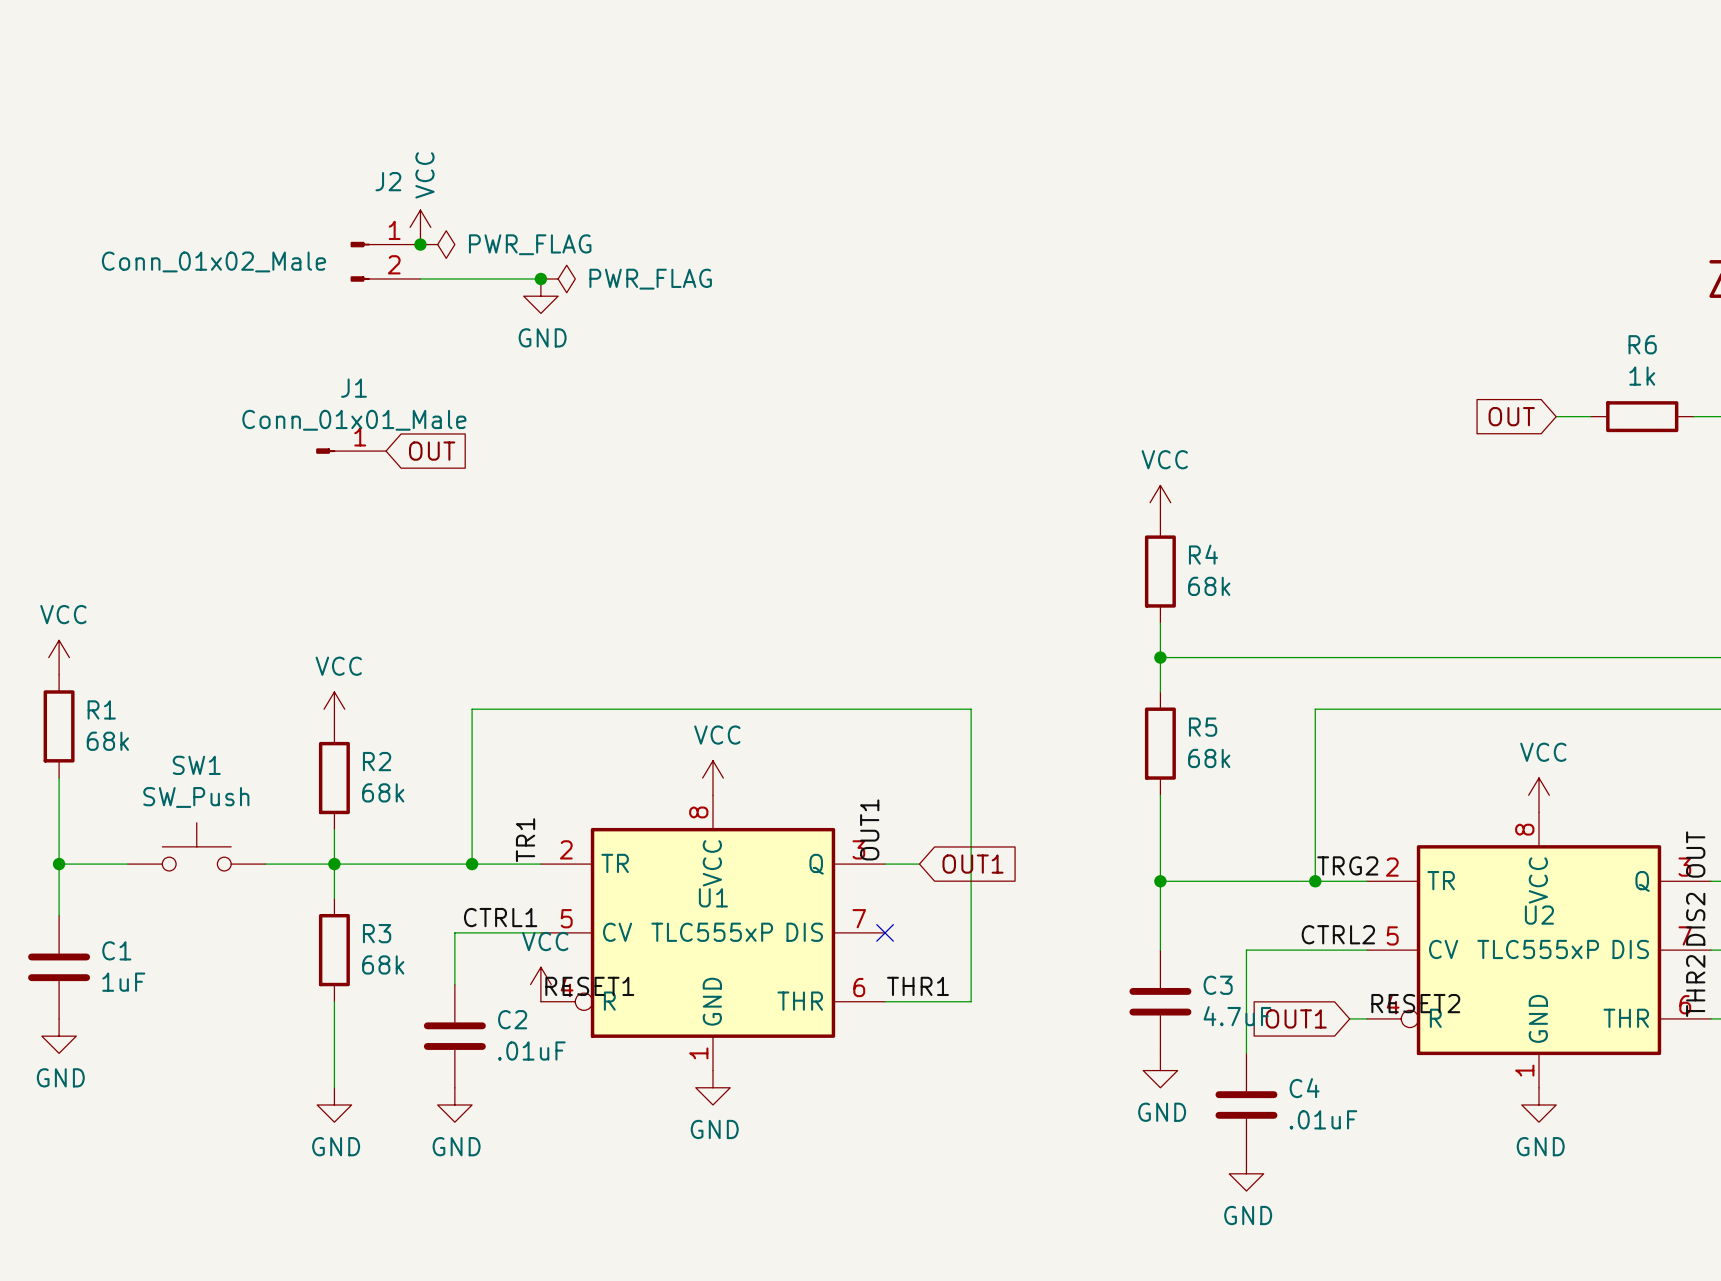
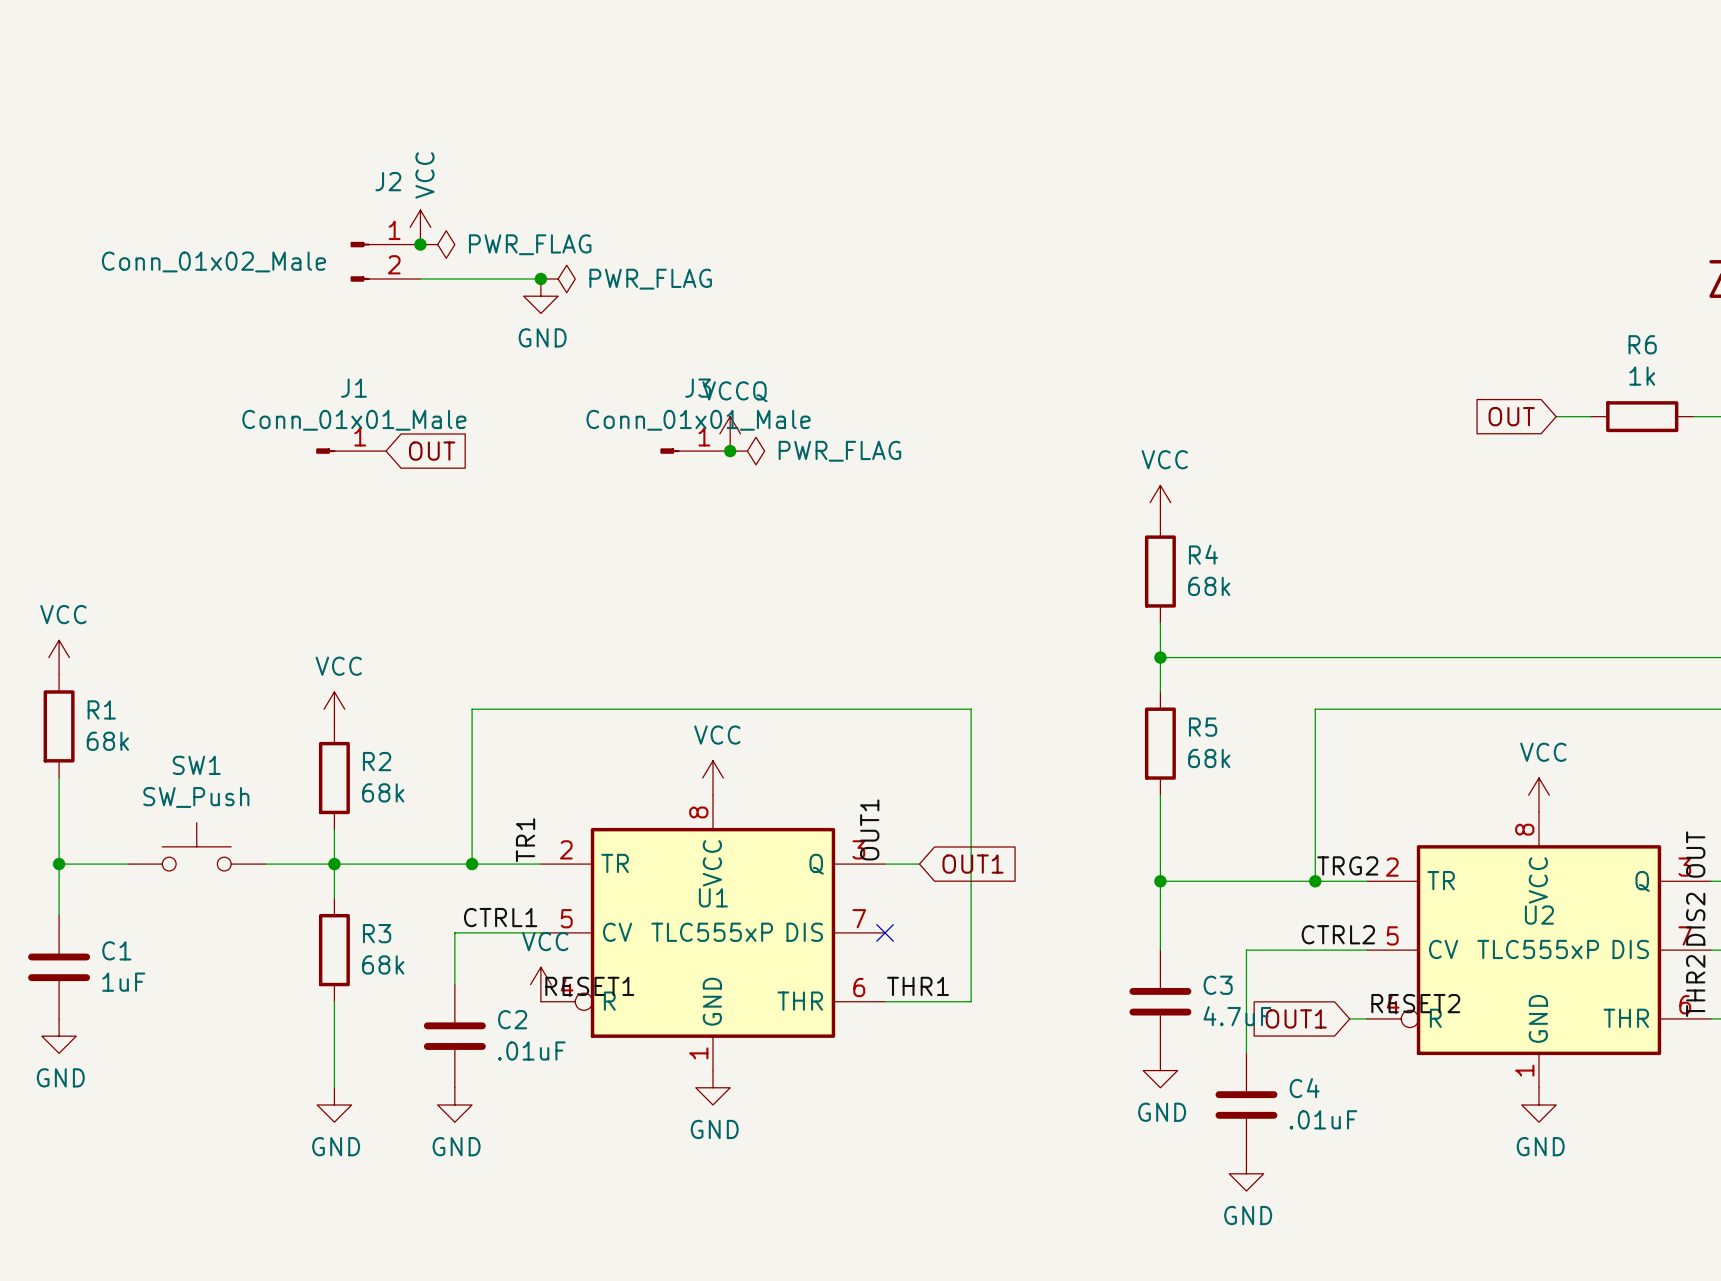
power symbol: none -> VCCQ (730, 433)
J3: none -> Conn_01x01_Male (695, 451)
junction: none -> (730, 451)
power symbol: none -> PWR_FLAG (747, 451)

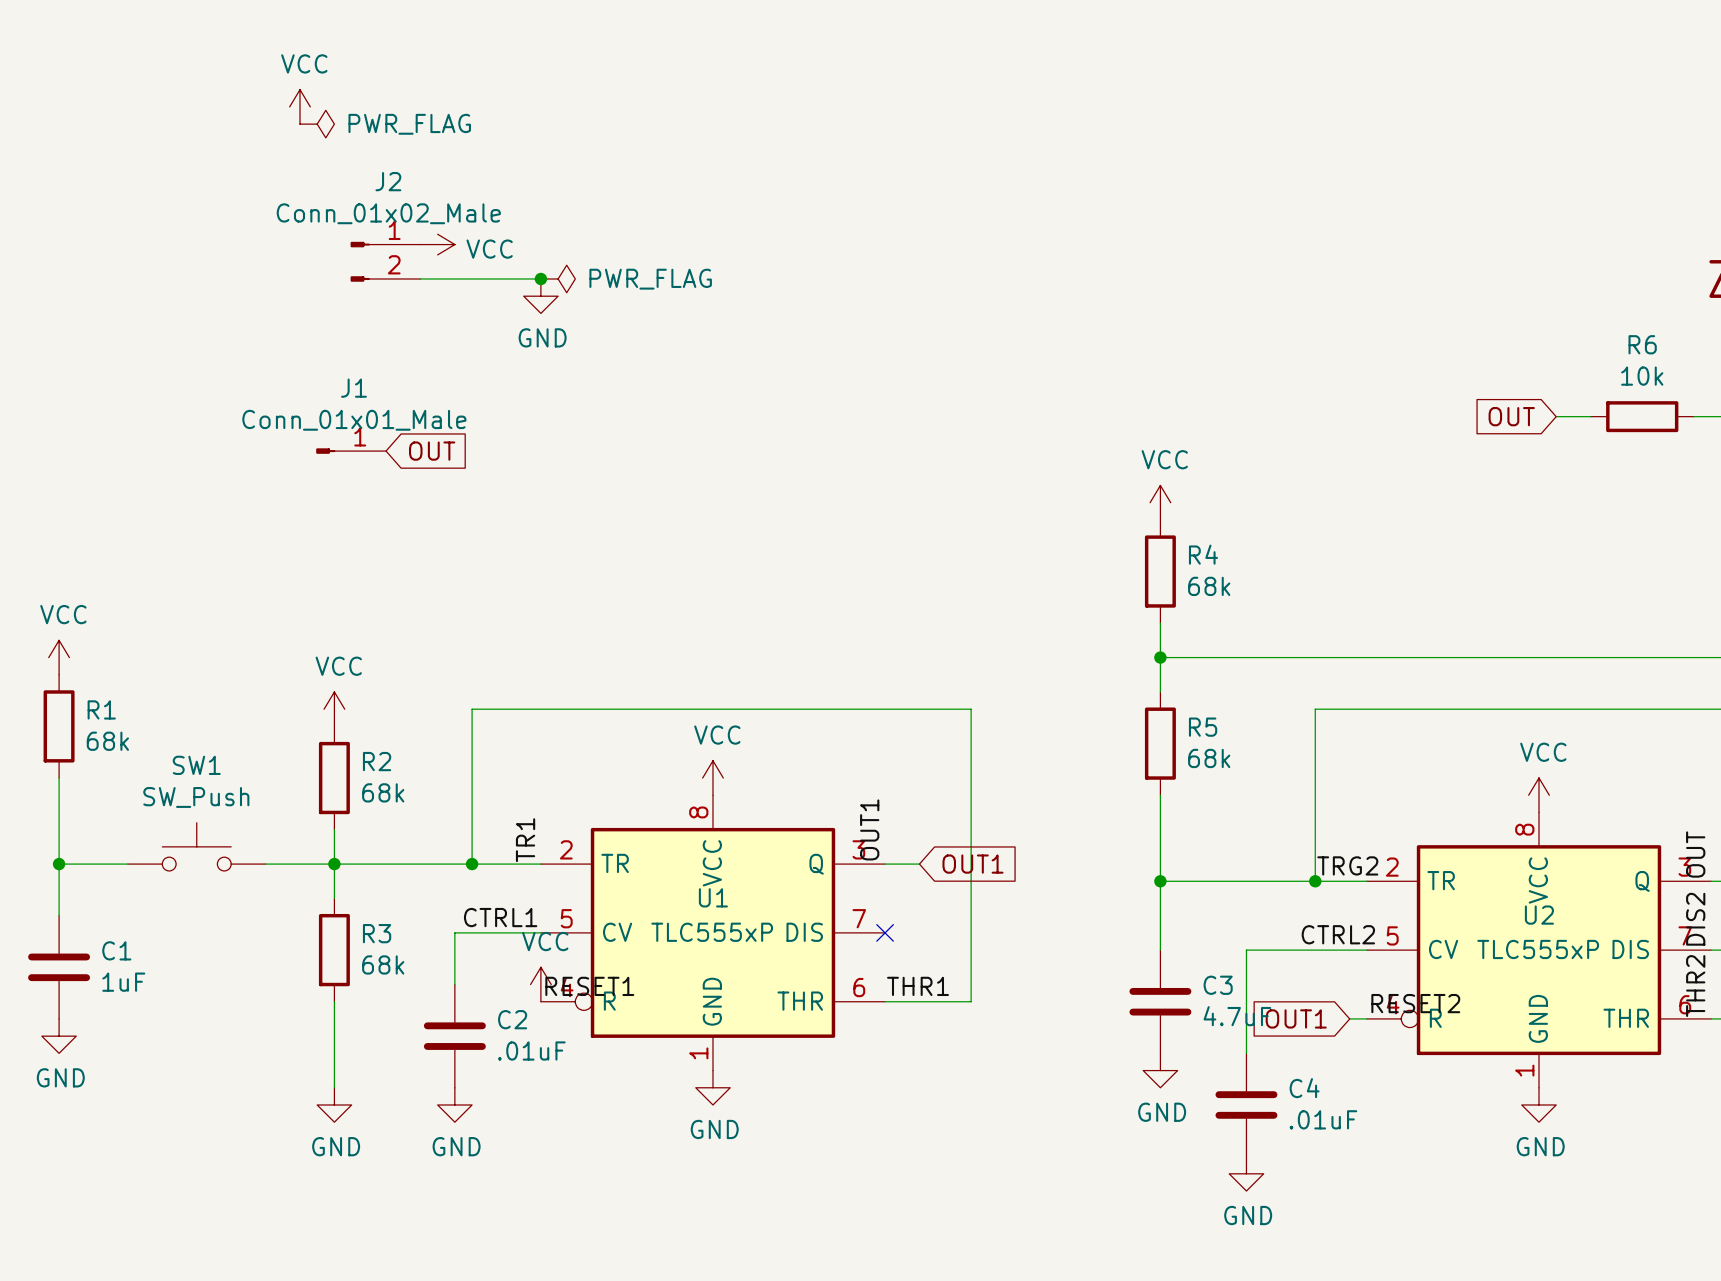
power symbol: none -> PWR_FLAG (317, 124)
power symbol text rotation: 0° (424, 175) -> 90° clockwise (304, 63)
power symbol position: VCC (420, 227) -> VCC (299, 106)
junction: (420, 244) -> none
power symbol: PWR_FLAG (437, 244) -> VCC (437, 244)
J2 value position: Conn_01x02_Male (213, 261) -> Conn_01x02_Male (388, 213)
R6 value: 1k (1642, 376) -> 10k (1642, 376)
power symbol: VCCQ (730, 433) -> none
J3: Conn_01x01_Male (695, 451) -> none
junction: (730, 451) -> none
power symbol: PWR_FLAG (747, 451) -> none

